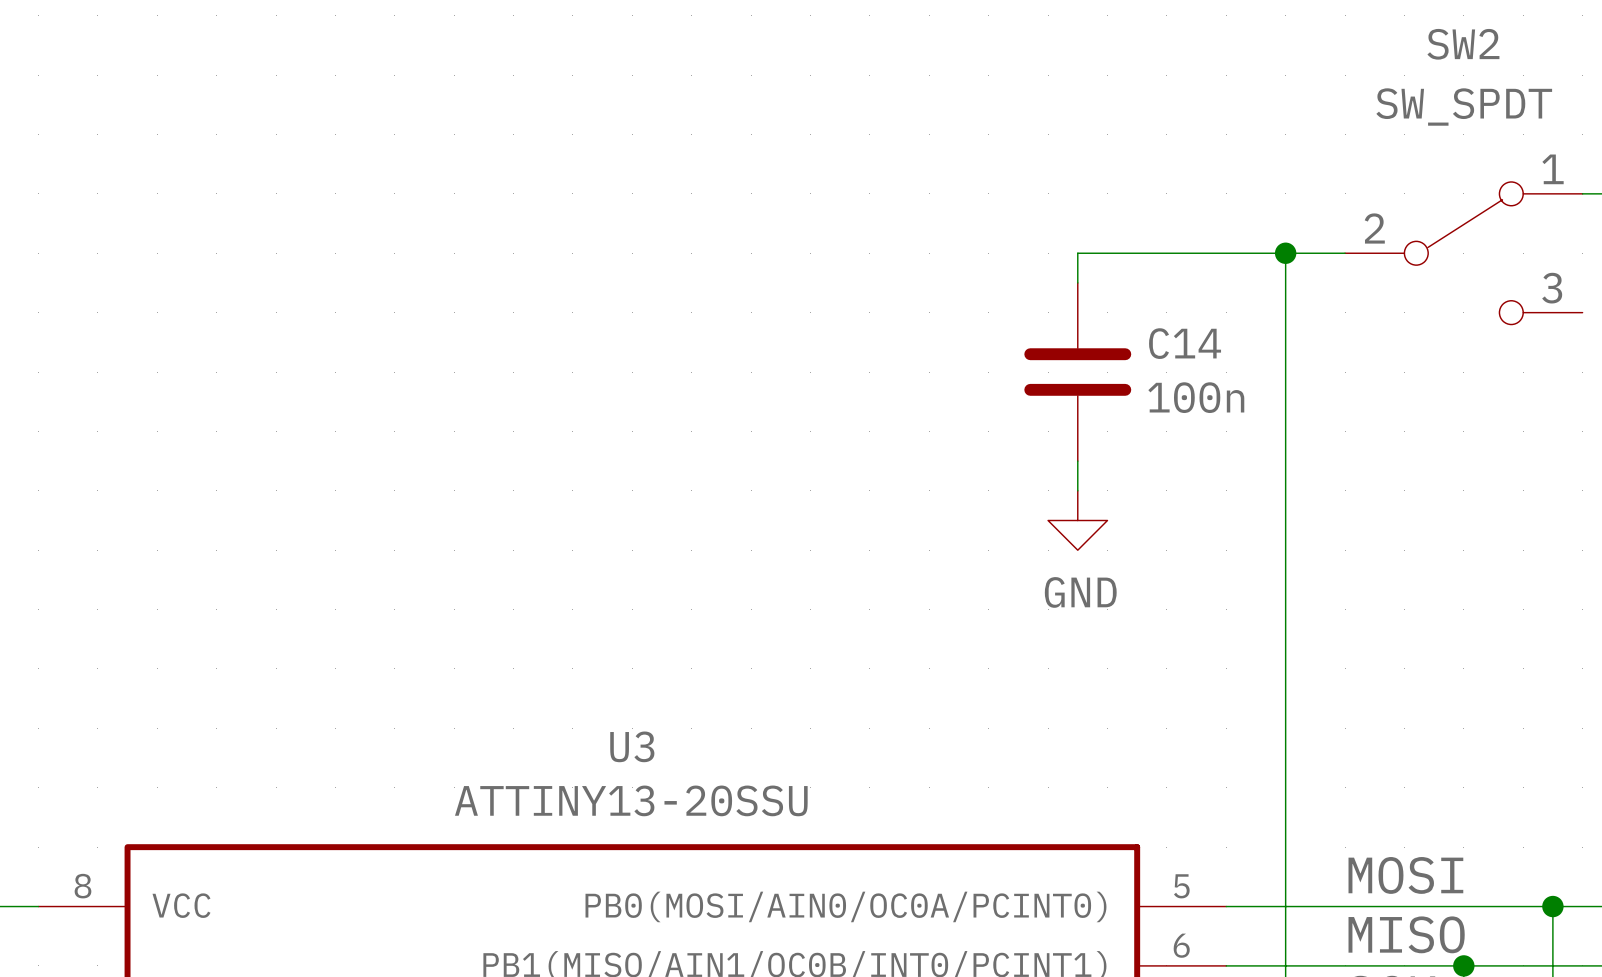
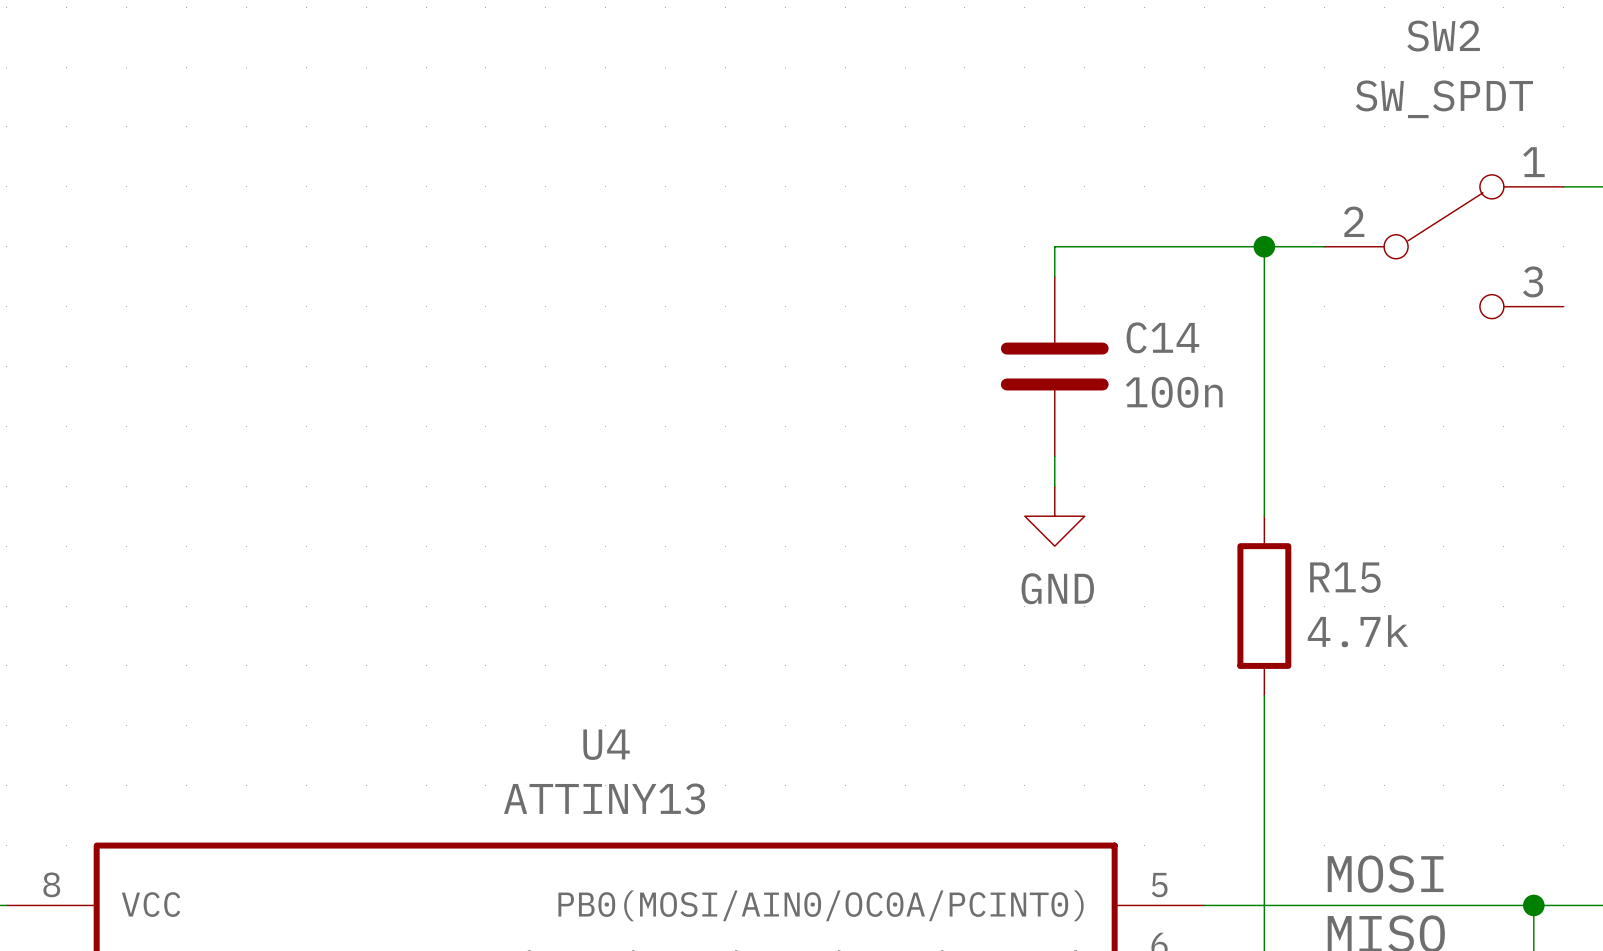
wire: (1285, 520) (1285, 698) -> none
R15: none -> 4.7k (1264, 606)
U3 name: U3 (632, 746) -> U4 (606, 744)
U3 value: ATTINY13-20SSU (631, 800) -> ATTINY13 (604, 798)

